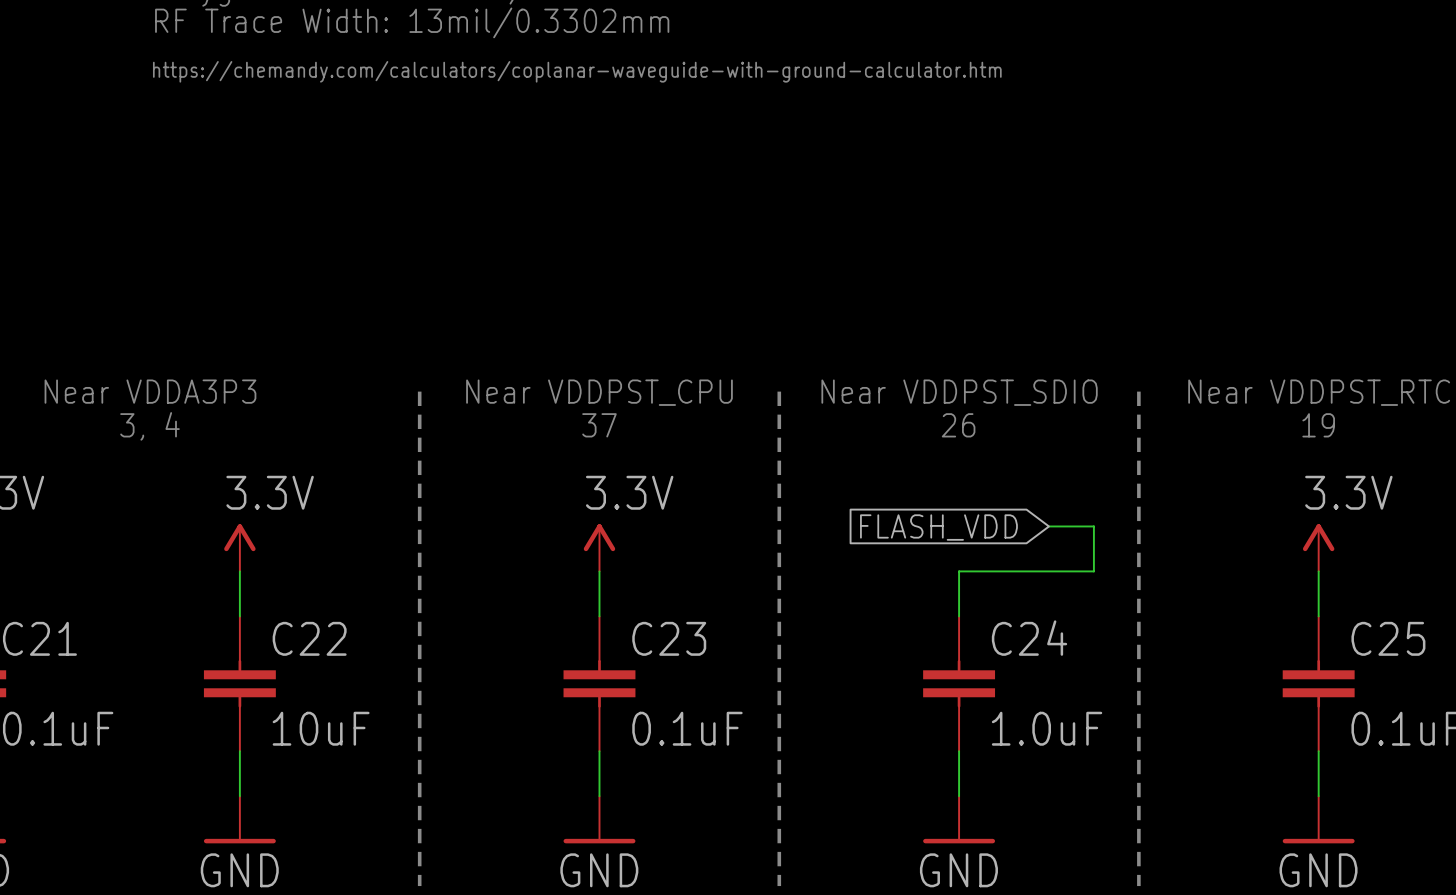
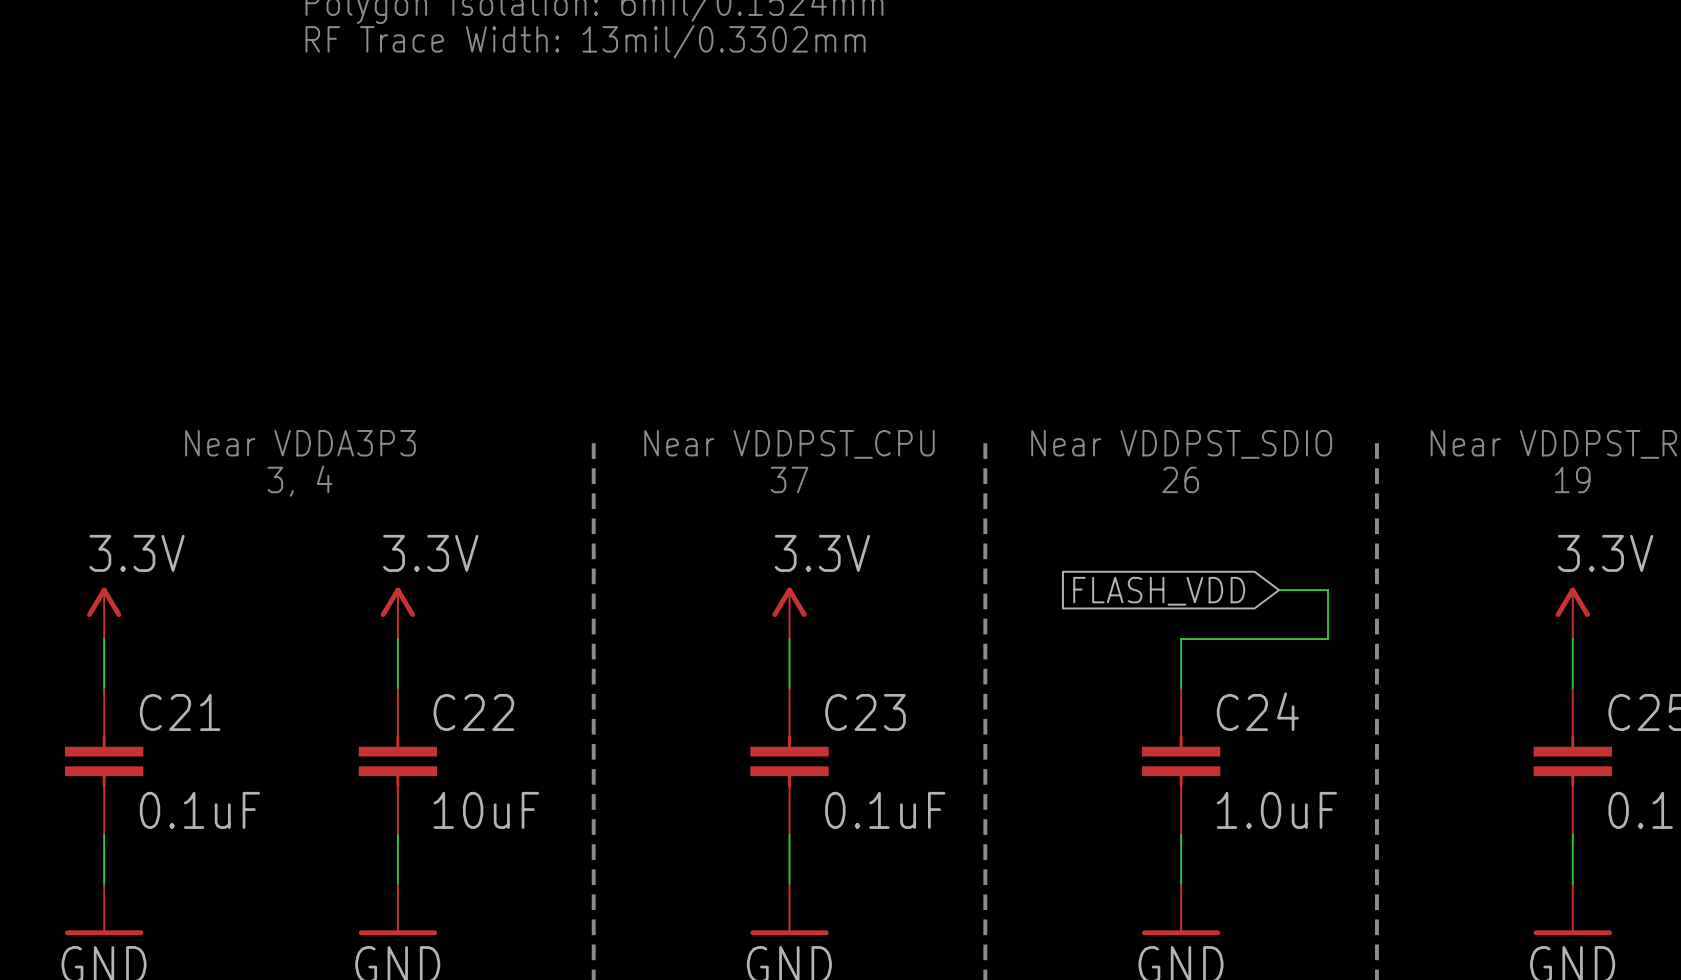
text: https://chemandy.com/calculators/coplanar-waveguide-with-ground-calculator.htm (577, 71) -> none

